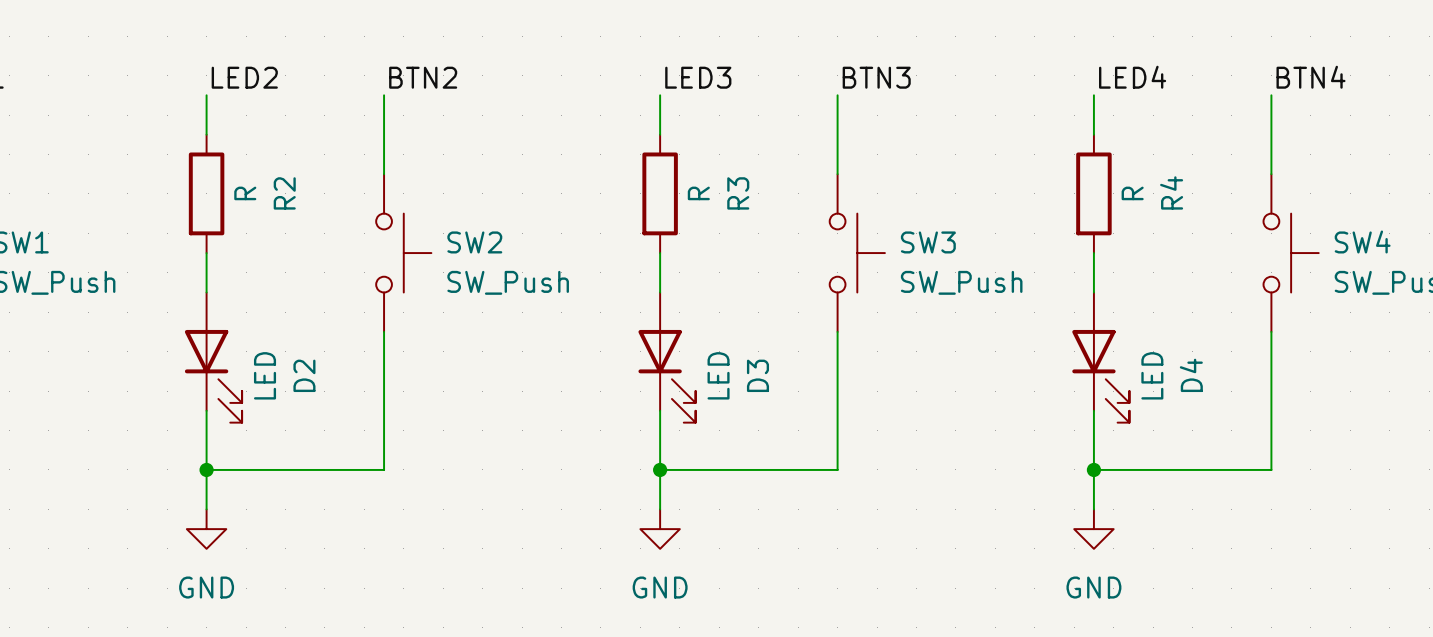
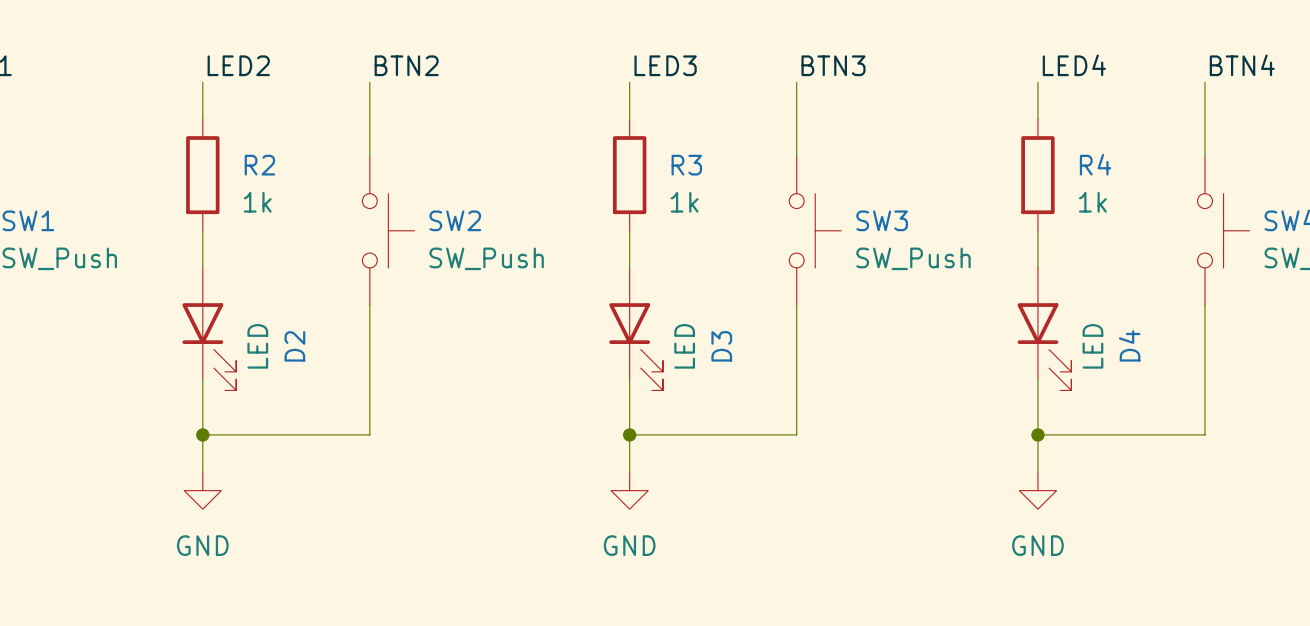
R4 name rotation: 0° (1171, 192) -> 90° clockwise (1095, 164)
R2 value: R (245, 193) -> 1k (257, 202)
R2 name rotation: 0° (284, 193) -> 90° clockwise (259, 165)
R3 value: R (698, 193) -> 1k (684, 202)
R3 name rotation: 0° (738, 193) -> 90° clockwise (686, 165)
R4 value: R (1132, 193) -> 1k (1092, 202)

